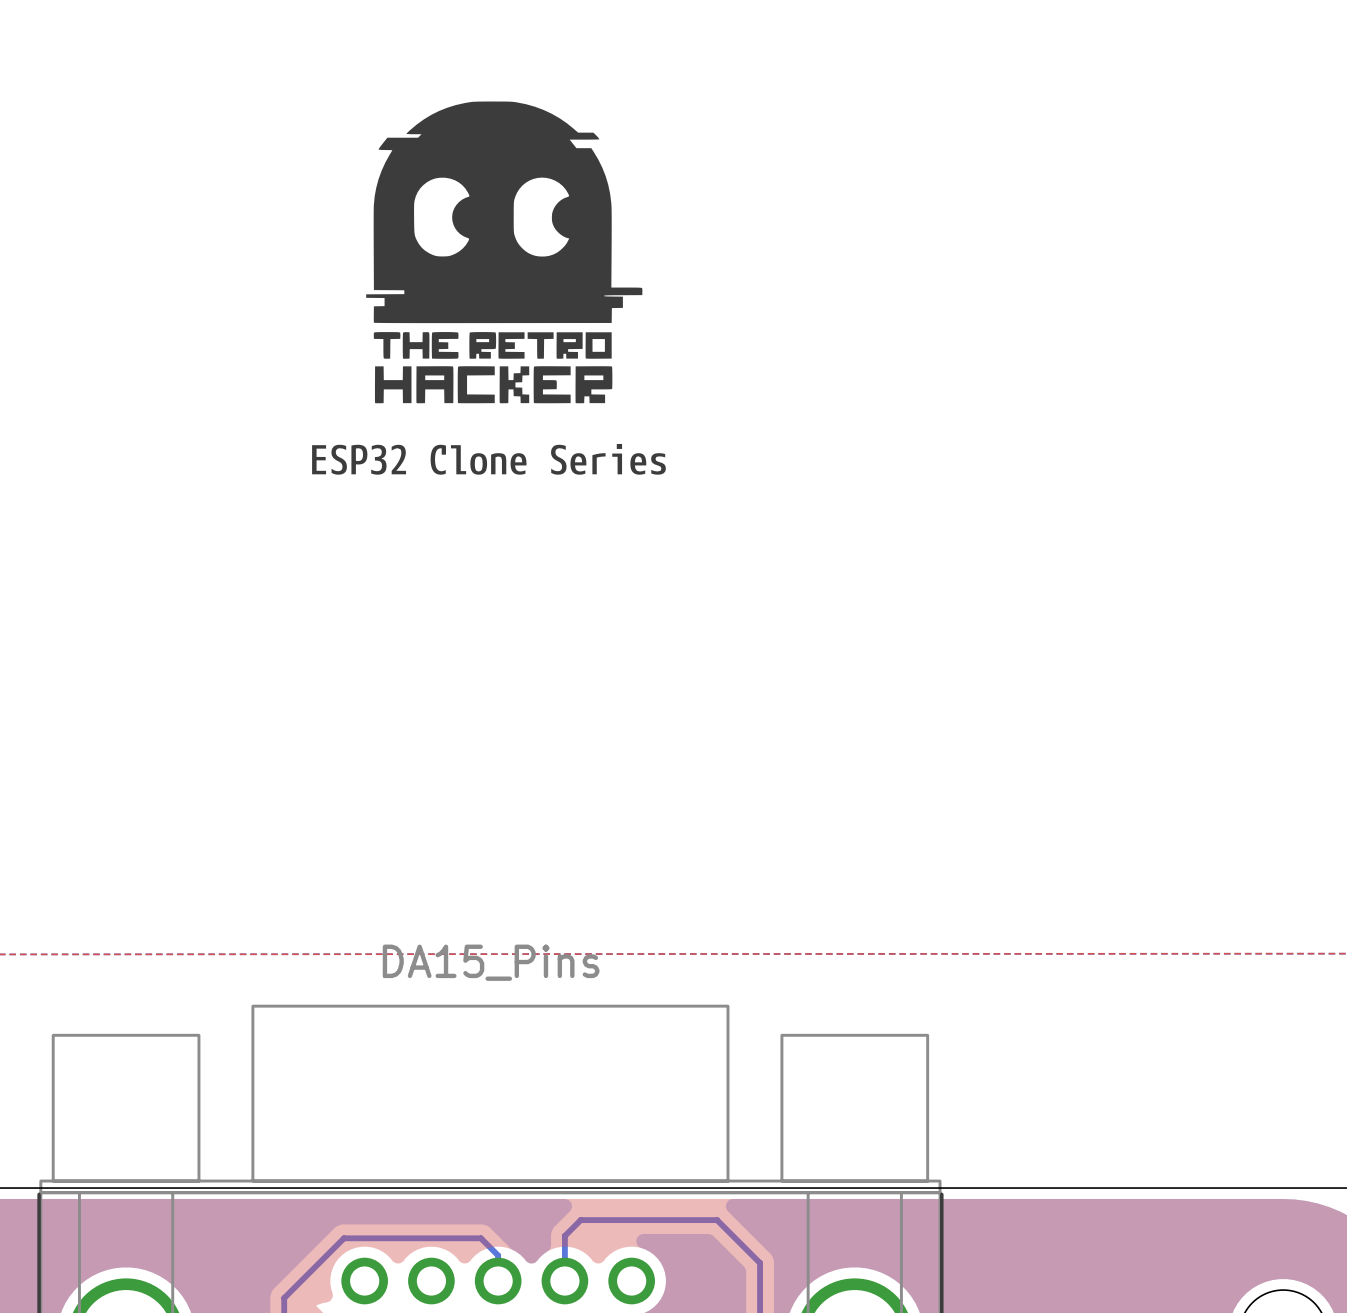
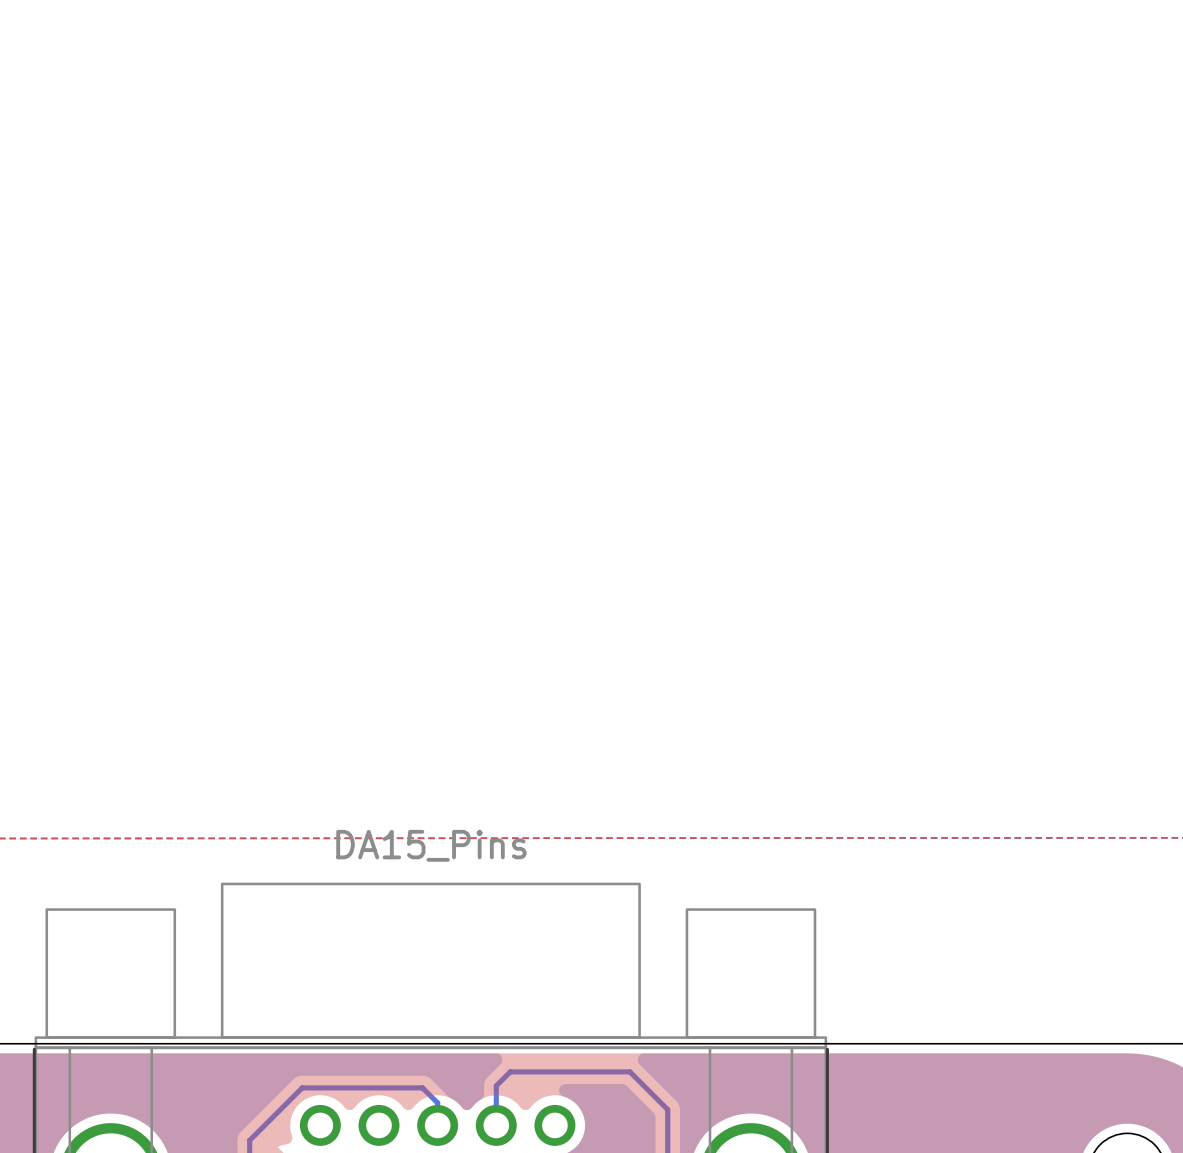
drawing: [366, 101, 643, 404] -> none
drawing: [312, 443, 666, 475] -> none

